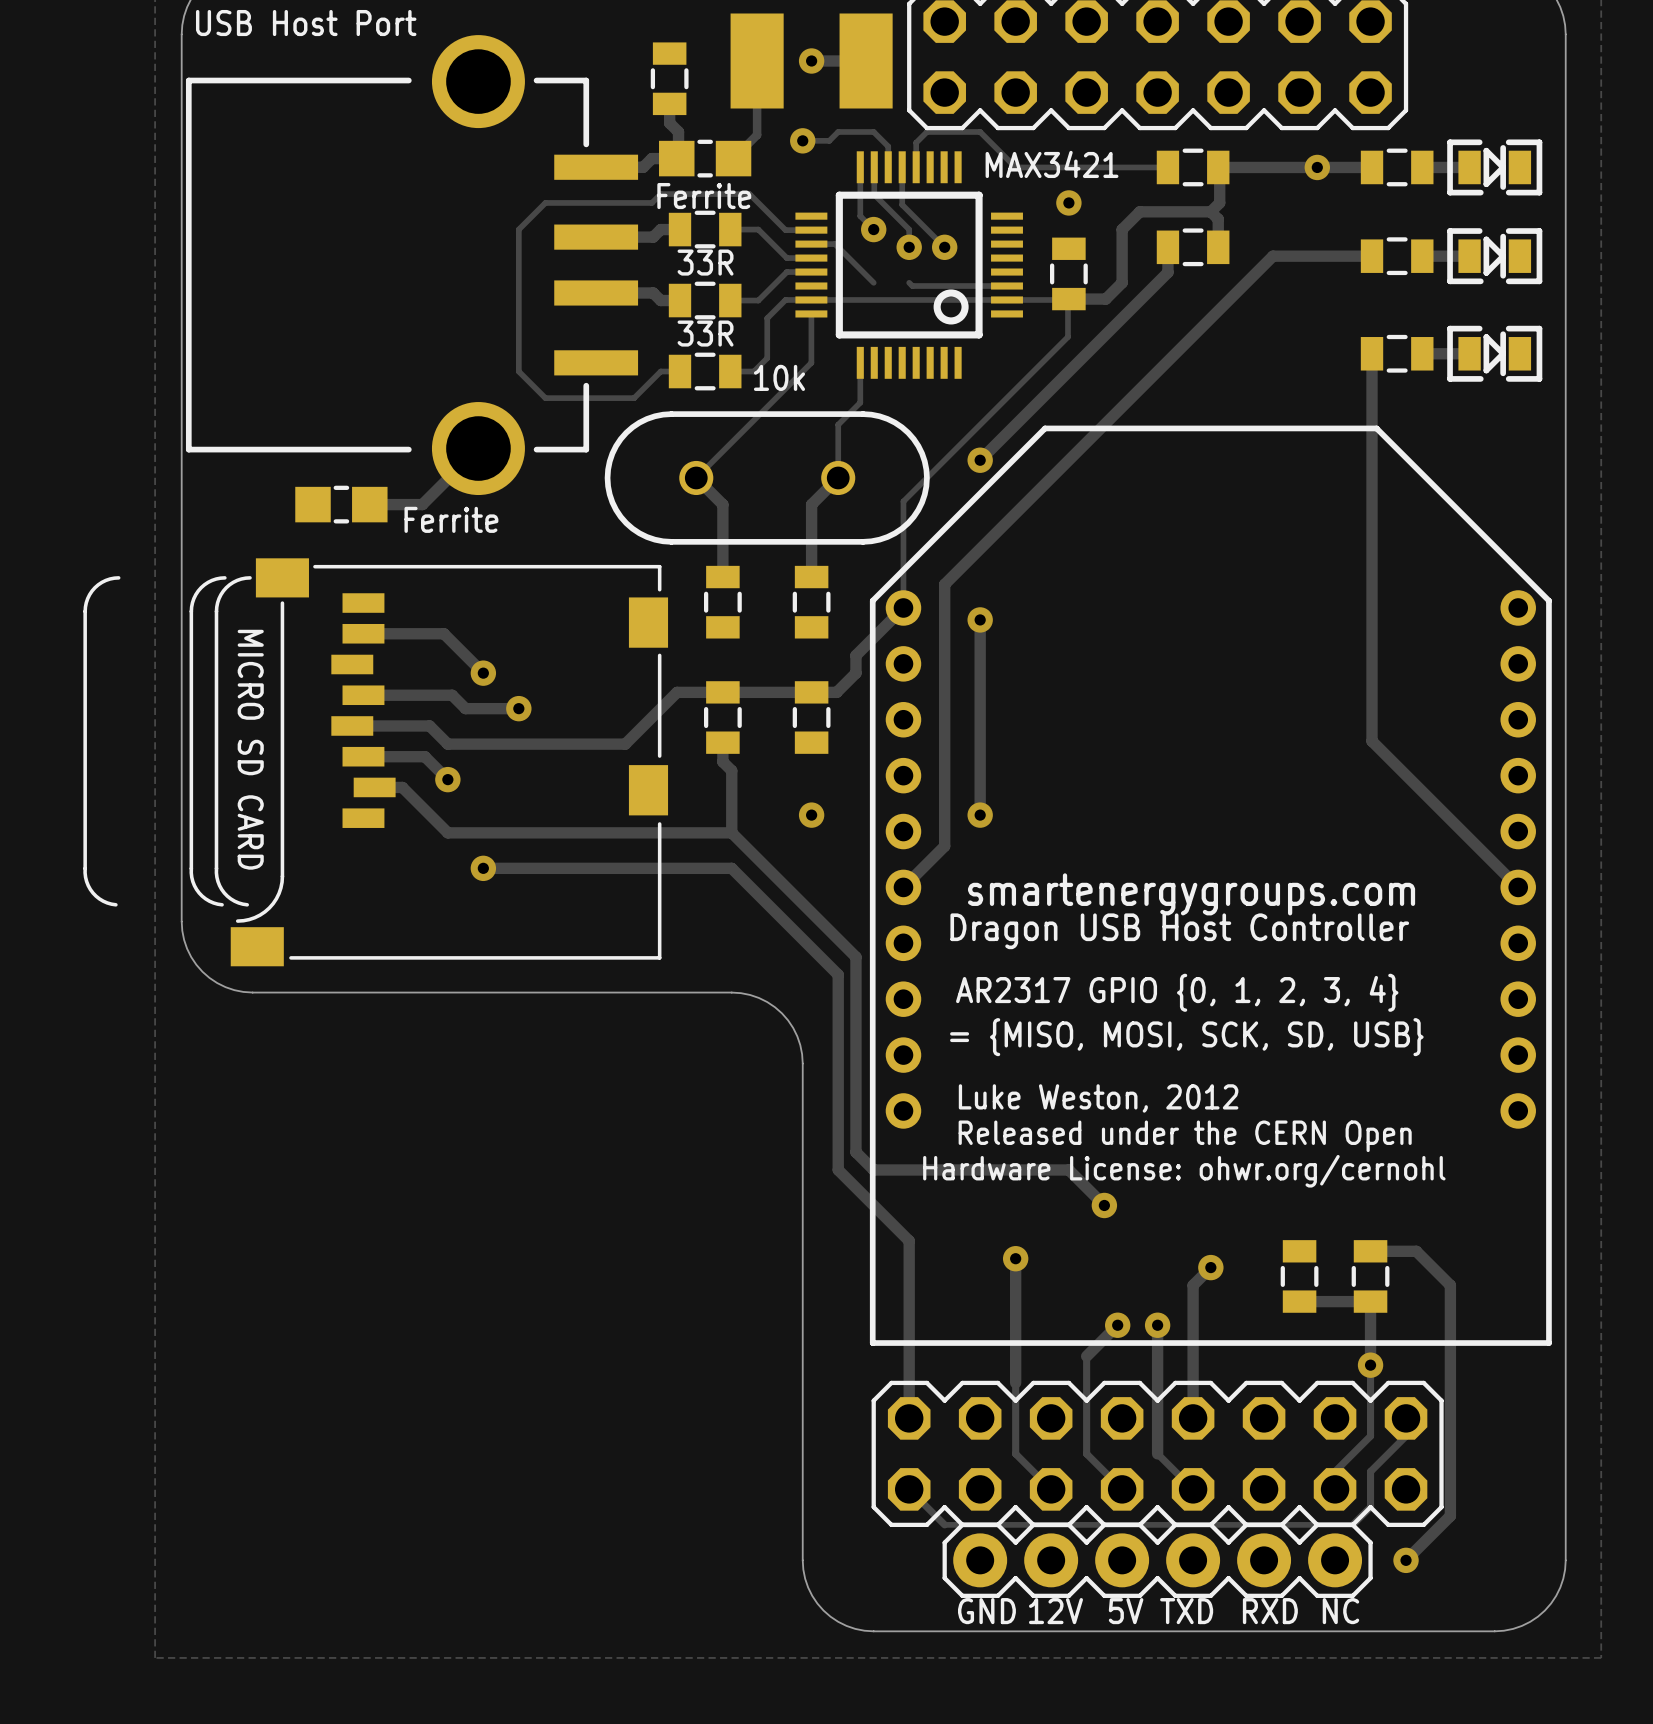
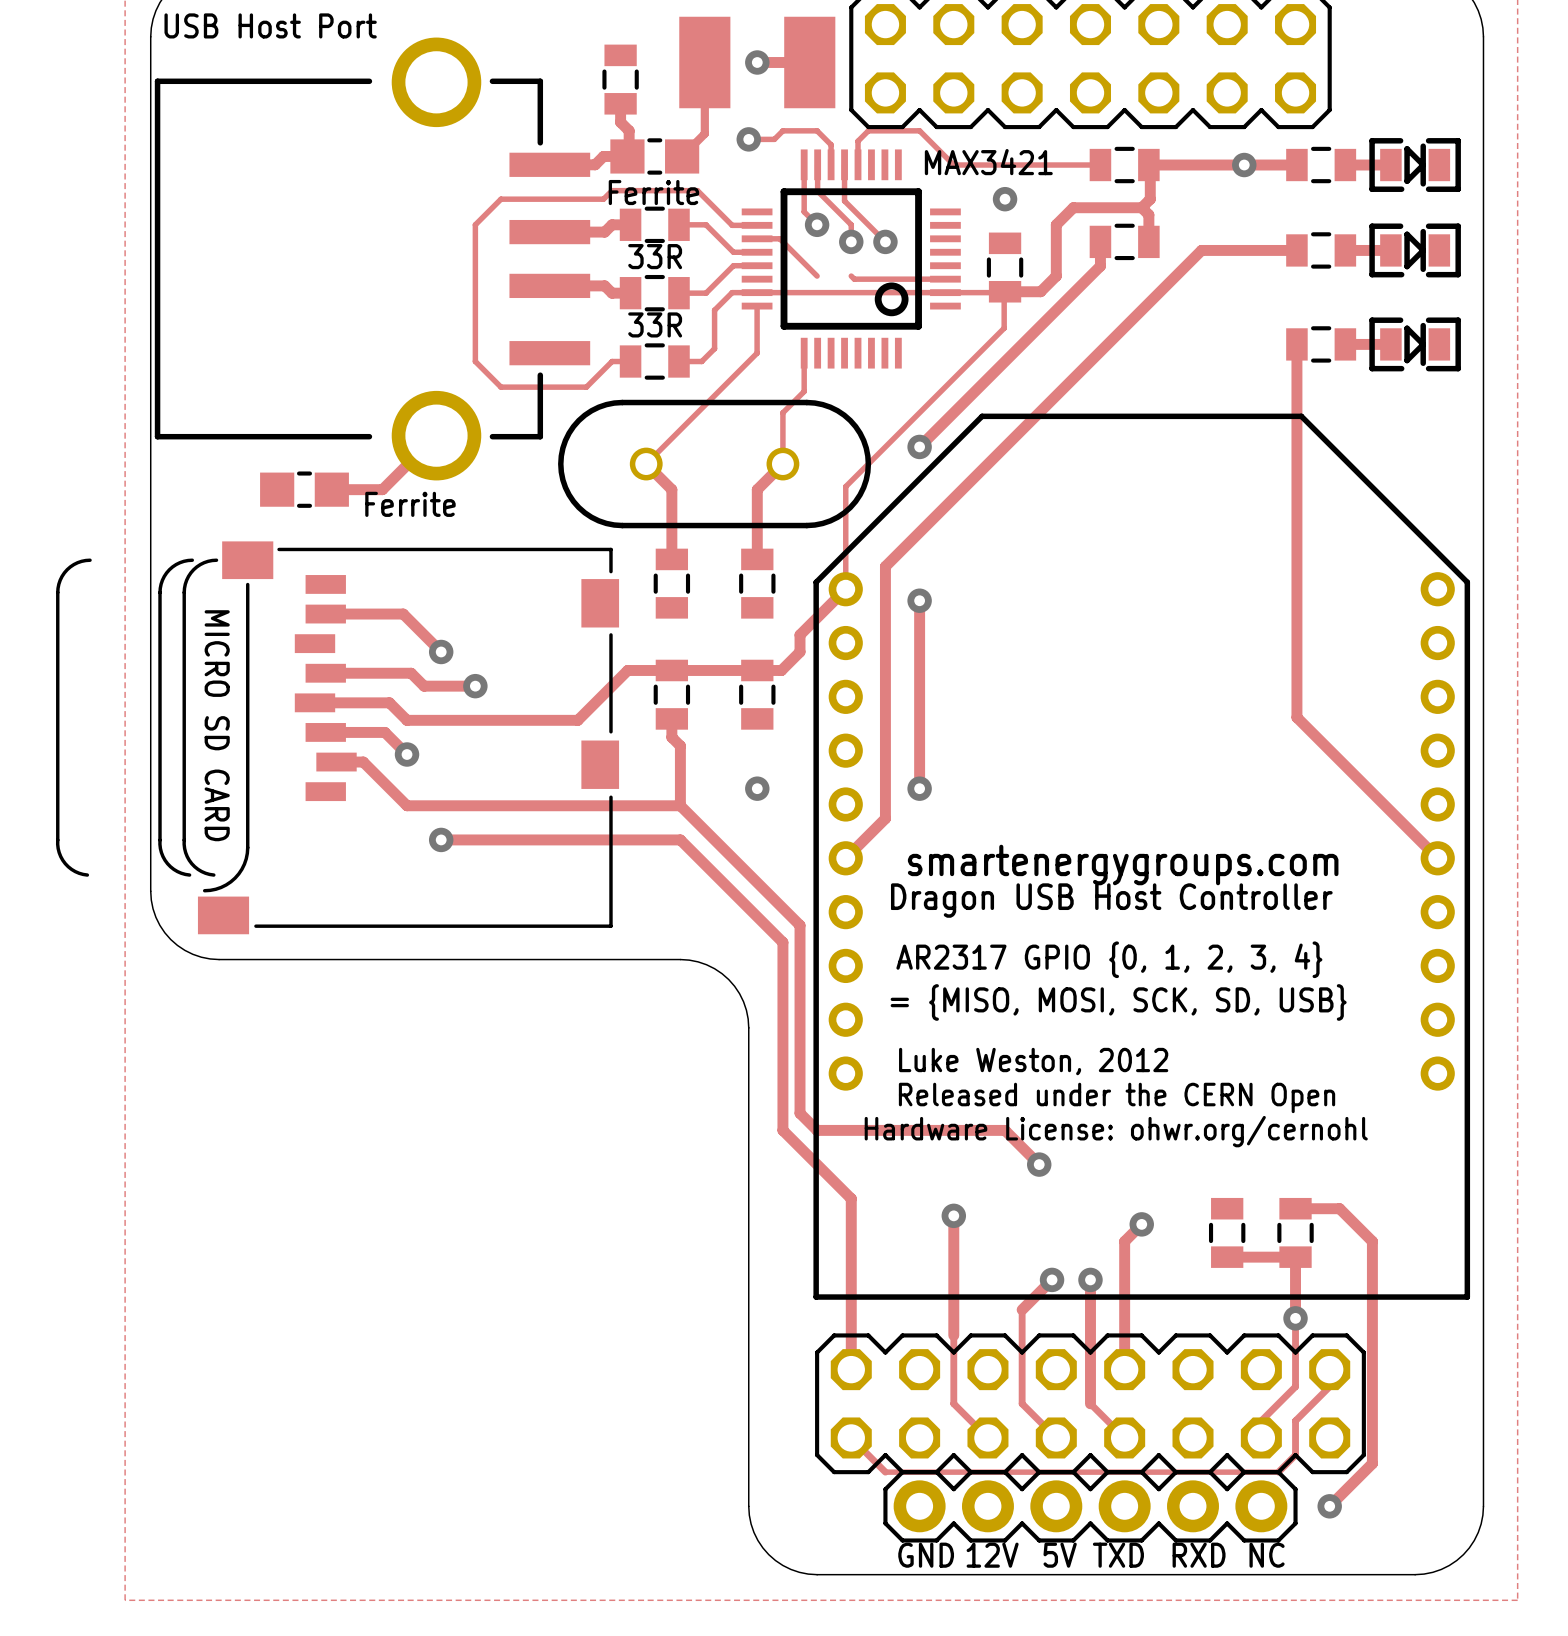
text: 10k (779, 377) -> none

